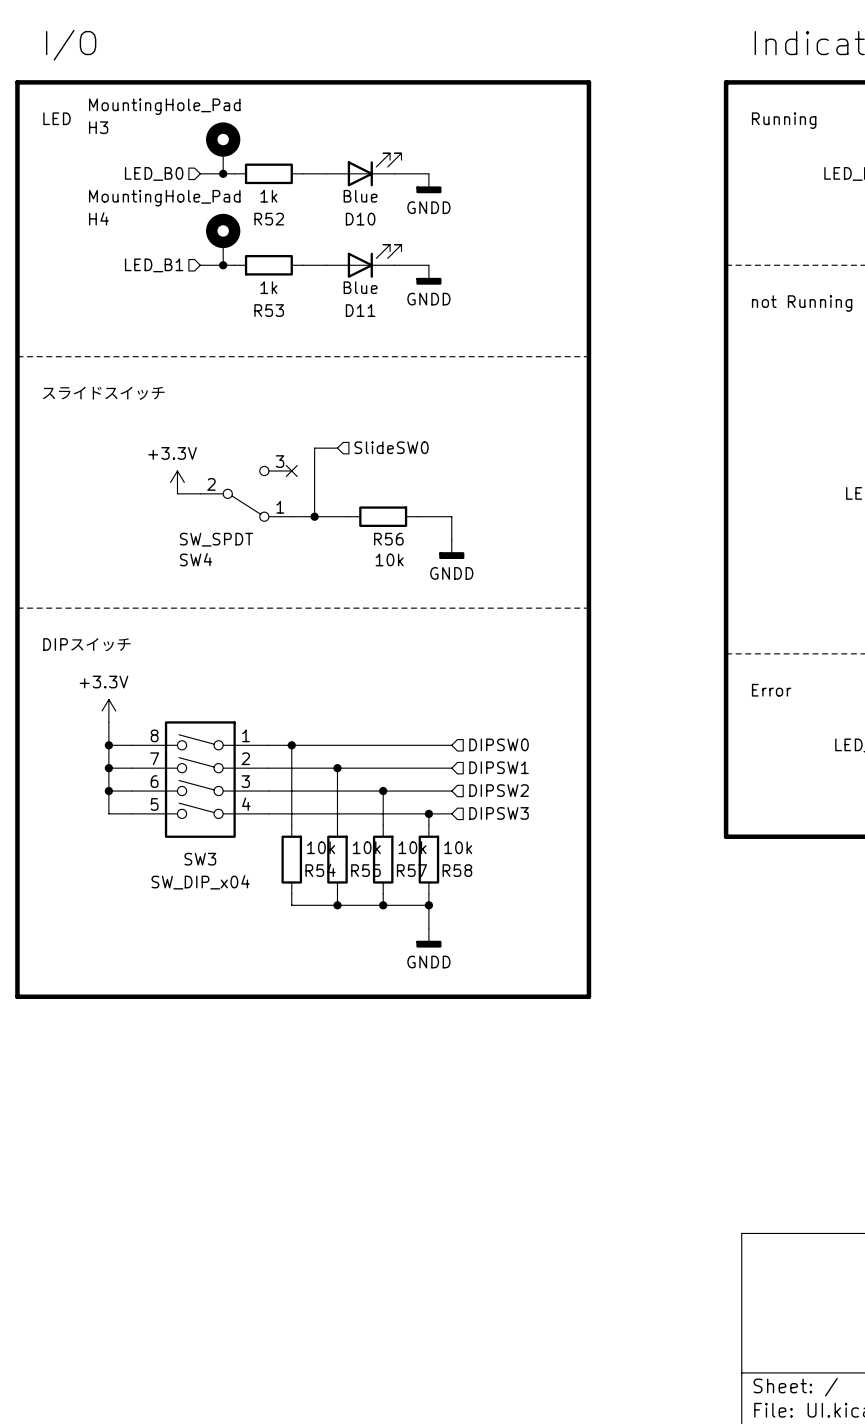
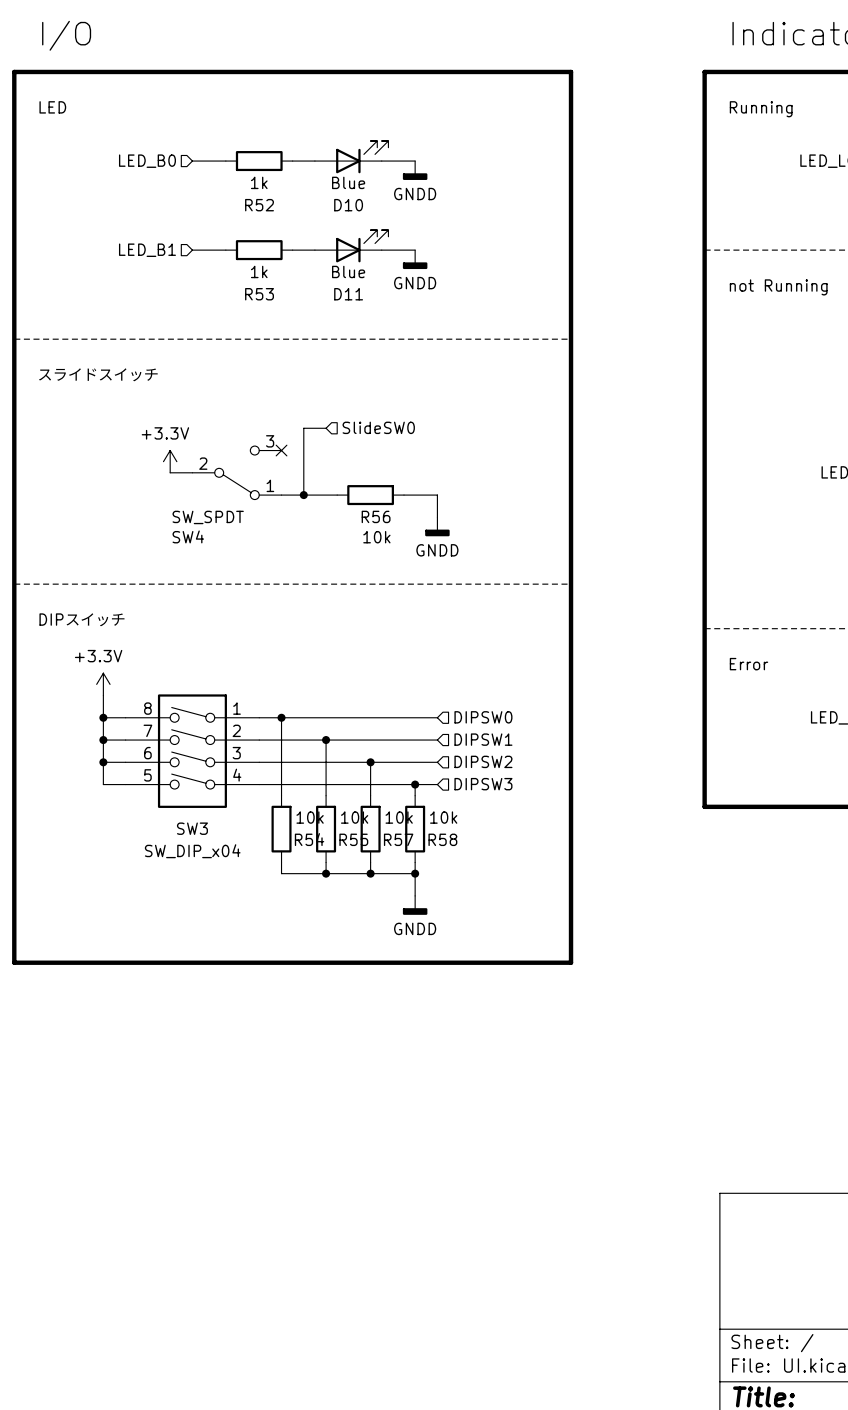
H3: MountingHole_Pad (223, 148) -> none
junction: (223, 173) -> none
H4: MountingHole_Pad (223, 239) -> none
junction: (223, 265) -> none

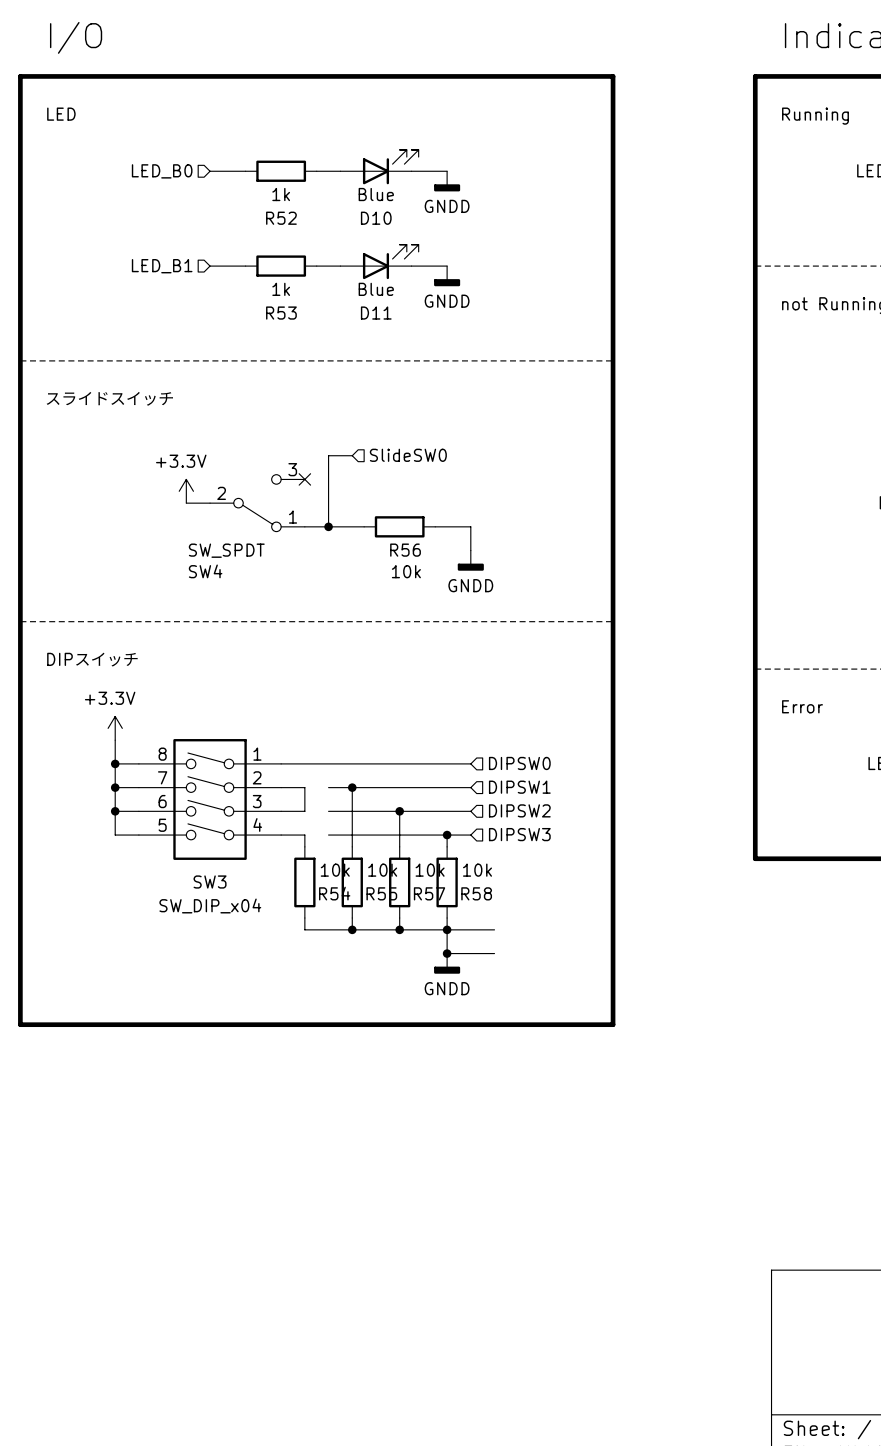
wire: (281, 717) (281, 740) (303, 740) -> none
junction: (281, 717) -> none
wire: (303, 762) (281, 762) (281, 784) (303, 784) -> none
wire: none -> (447, 929) (494, 929)
wire: none -> (447, 953) (494, 953)
junction: none -> (447, 953)

